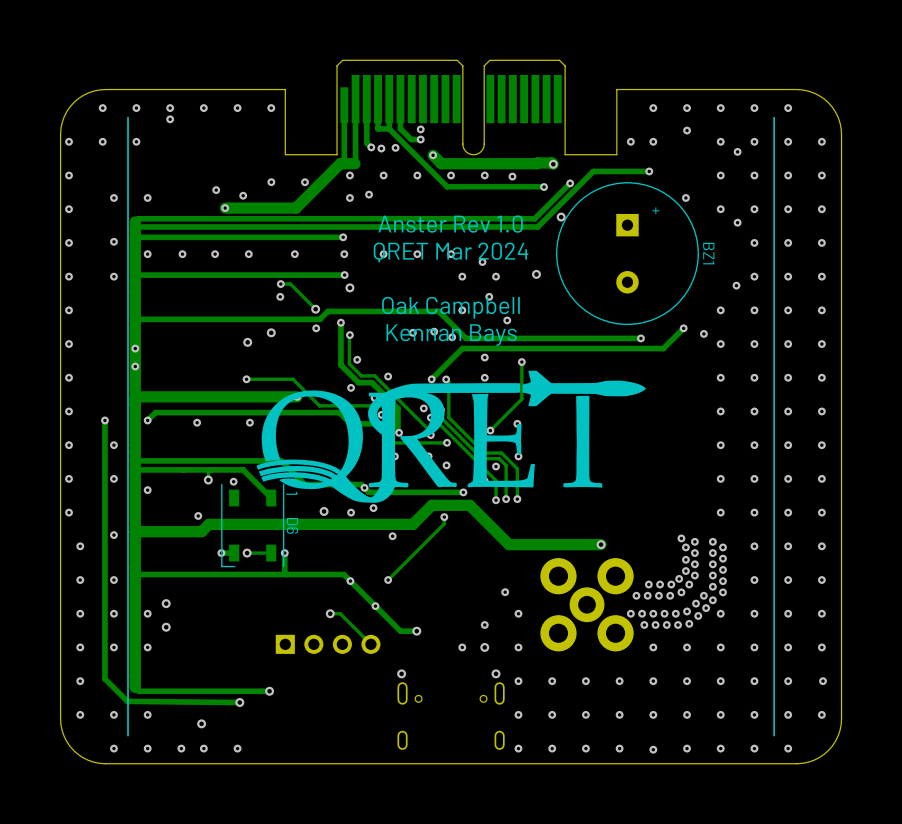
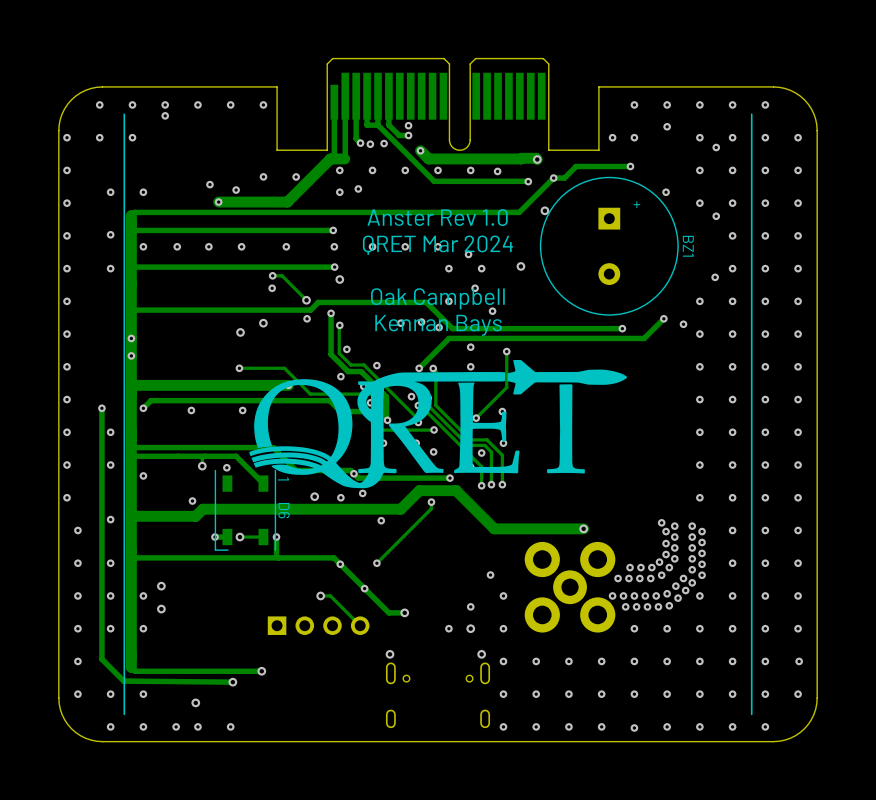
track: (581, 183) (537, 226) (139, 226) (135, 230) -> (564, 178) (553, 178)

